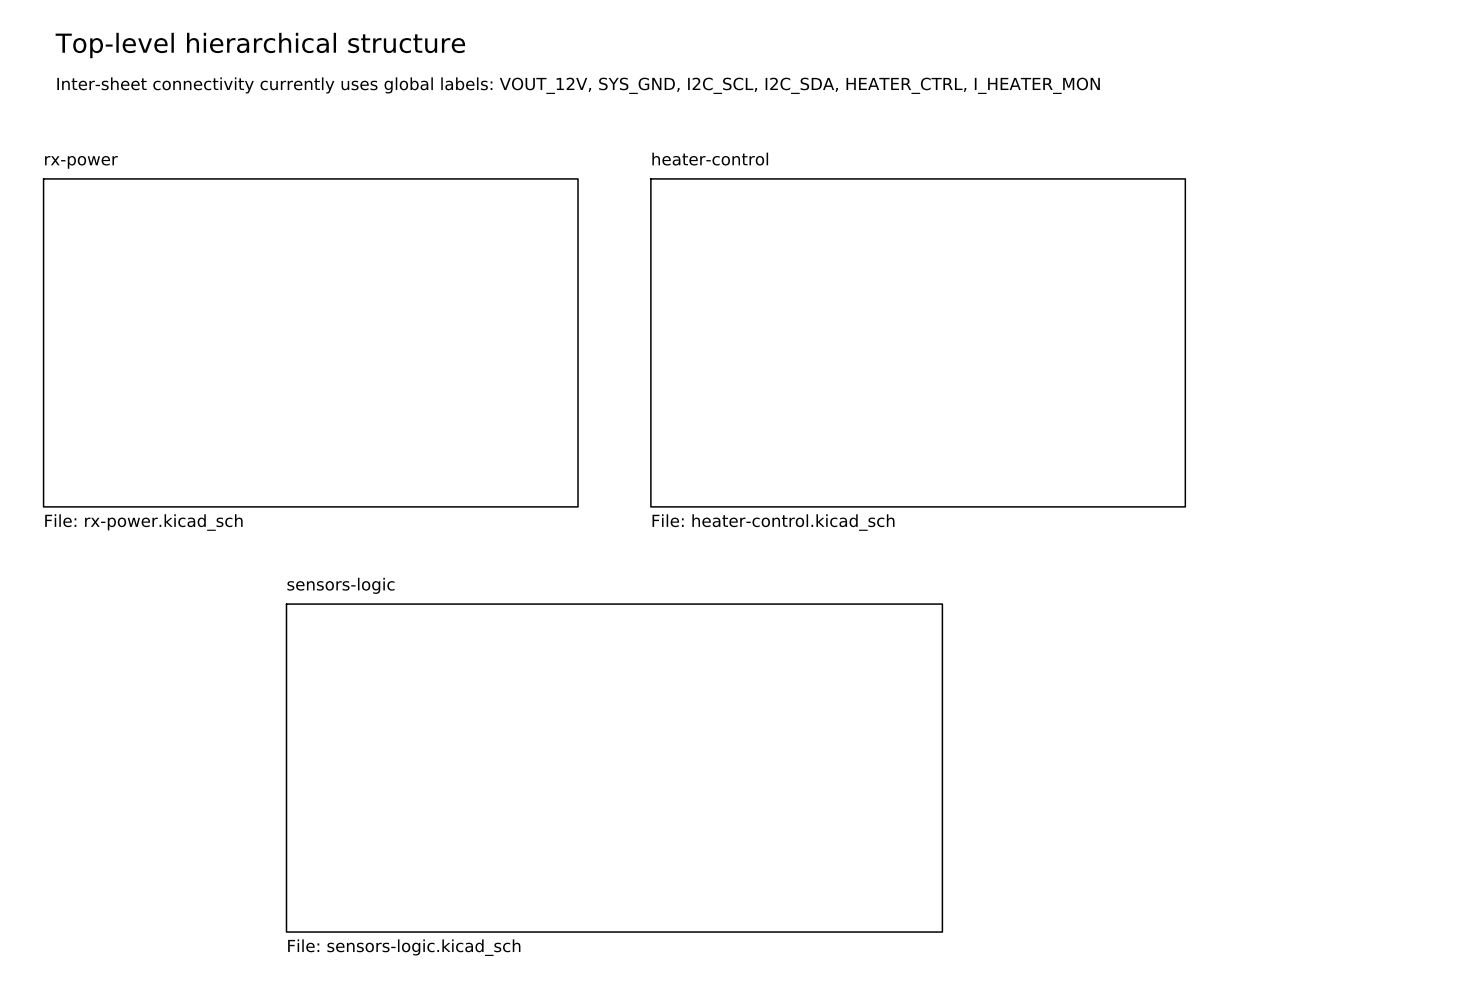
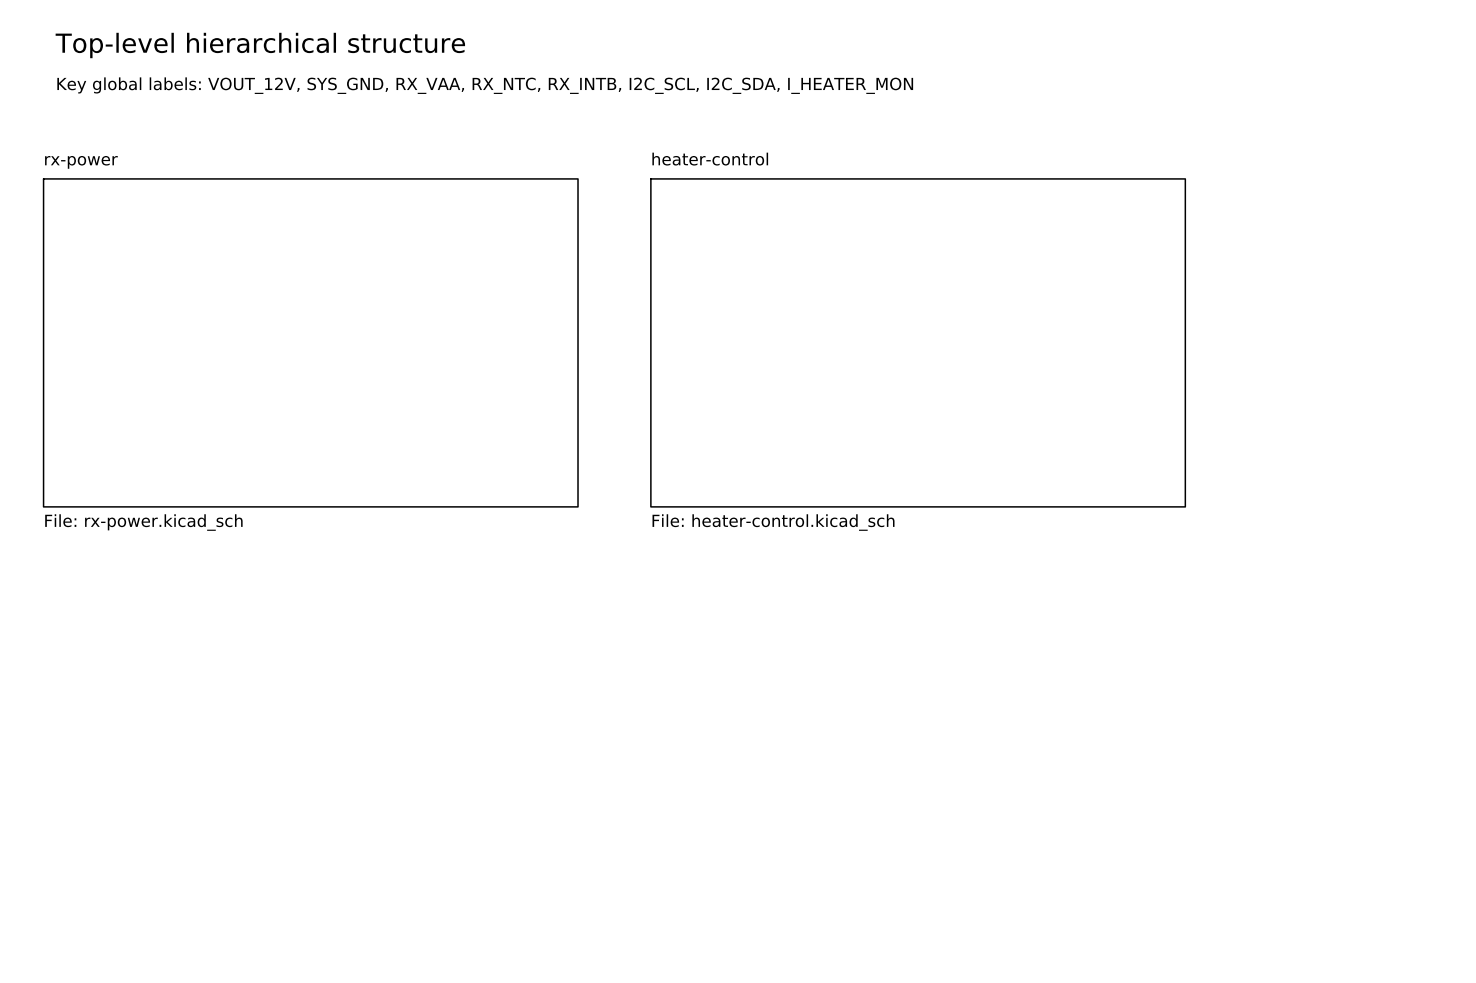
text: Inter-sheet connectivity currently uses global labels: VOUT_12V, SYS_GND, I2C_SCL, I2C_SDA, HEATER_CTRL, I_HEATER_MON (578, 85) -> Key global labels: VOUT_12V, SYS_GND, RX_VAA, RX_NTC, RX_INTB, I2C_SCL, I2C_SDA, I_HEATER_MON (485, 85)
sheet sensors-logic: File: sensors-logic.kicad_sch (614, 768) -> none

